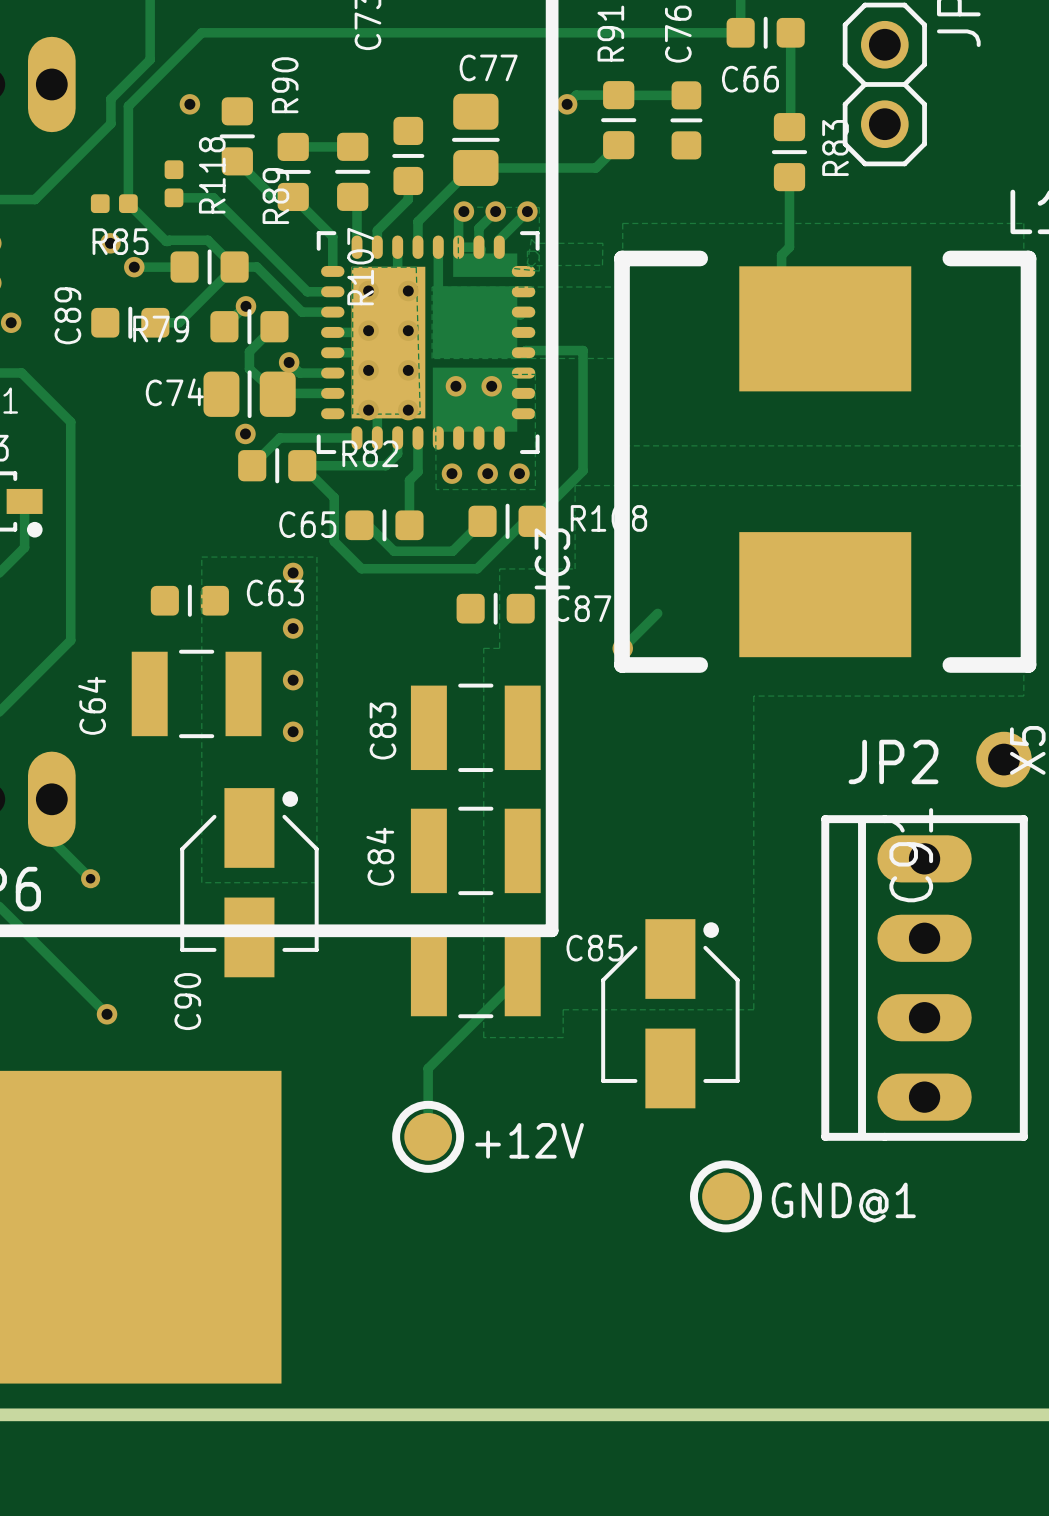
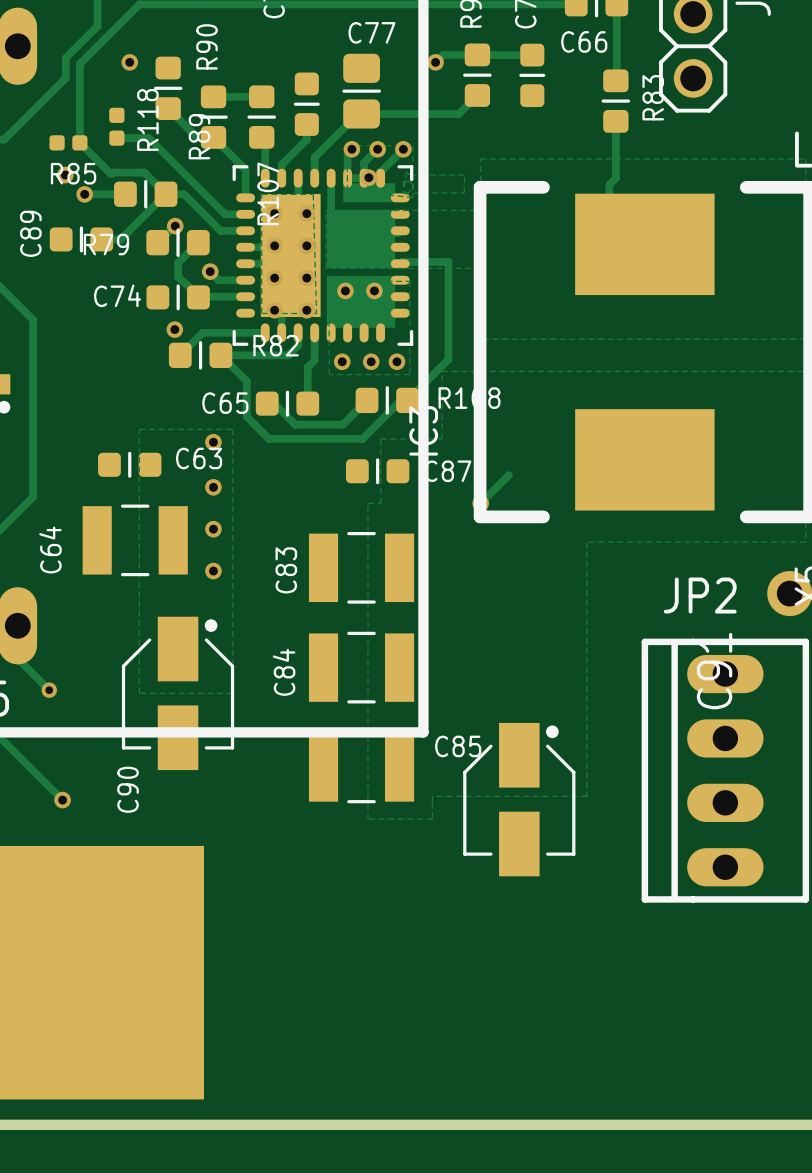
via: none -> (368, 177)
C74 footprint: [203, 370, 296, 419] -> [146, 284, 210, 311]
track: (522, 974) (428, 1068) (428, 1136) -> none
+12V: (428, 1136) -> none
GND@1: (725, 1196) -> none

